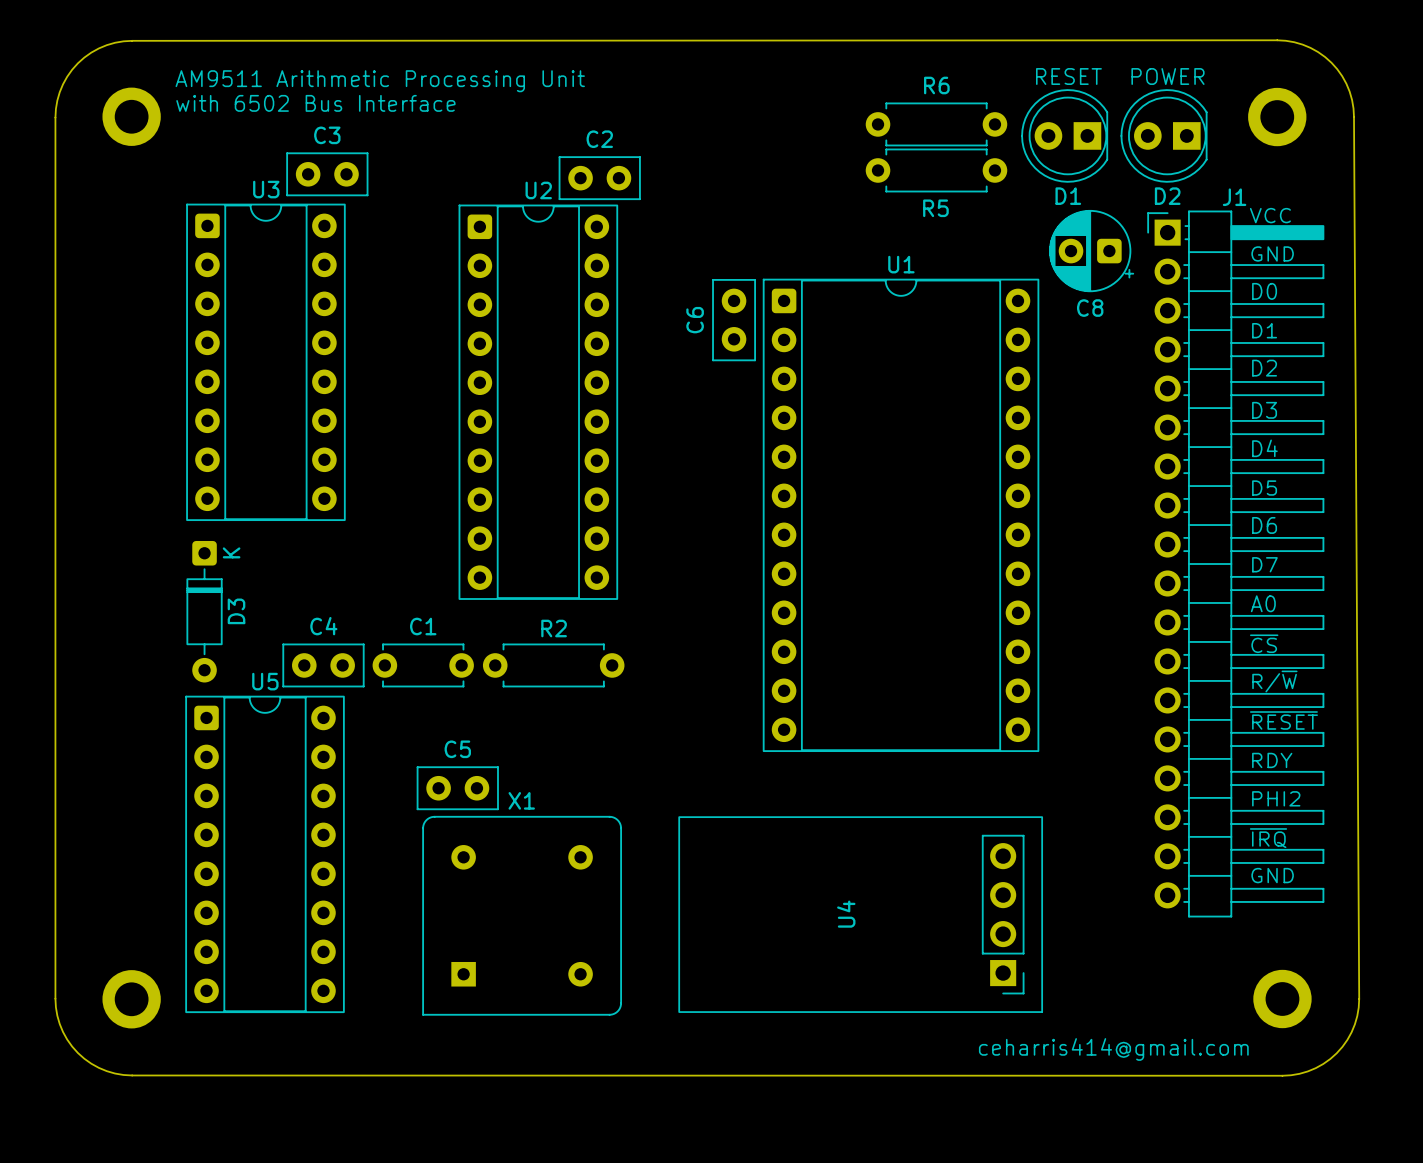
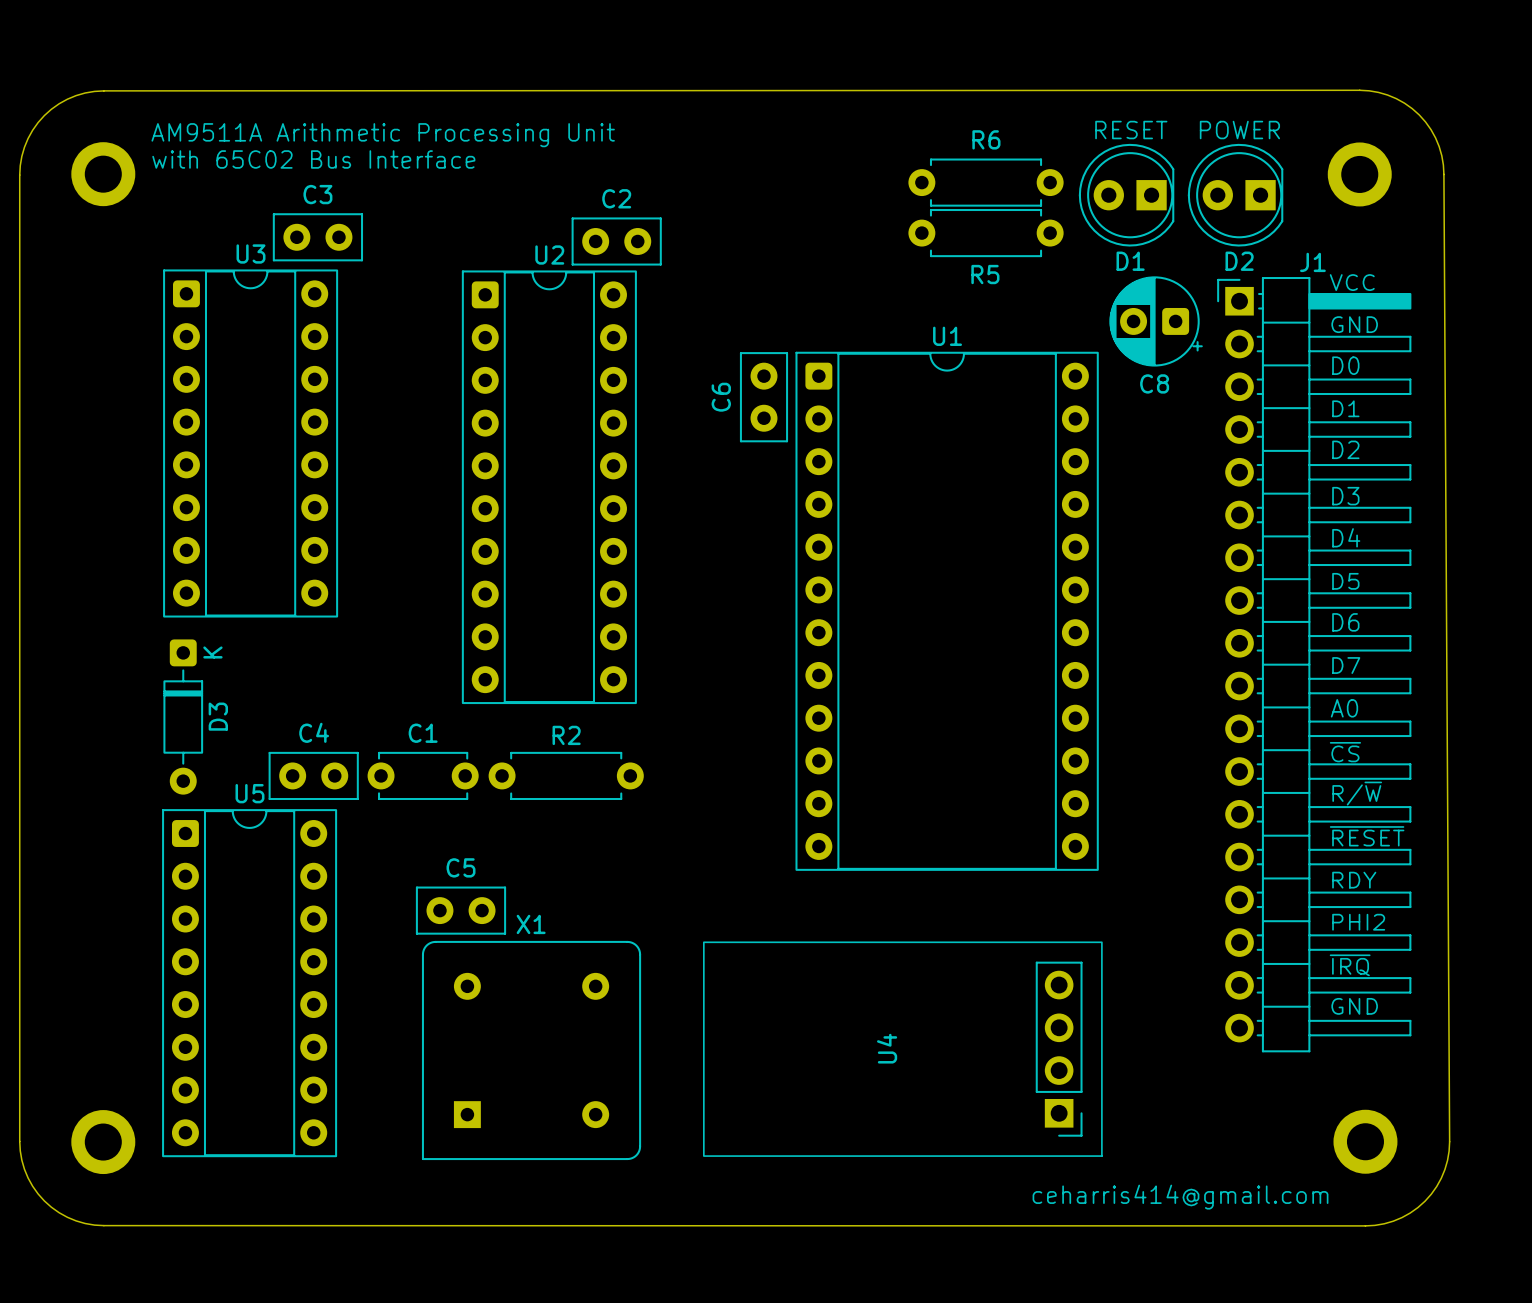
text: AM9511 Arithmetic Processing Unit (380, 81) -> AM9511A Arithmetic Processing Unit (383, 135)
text: with 6502 Bus Interface (315, 103) -> with 65C02 Bus Interface (313, 159)

